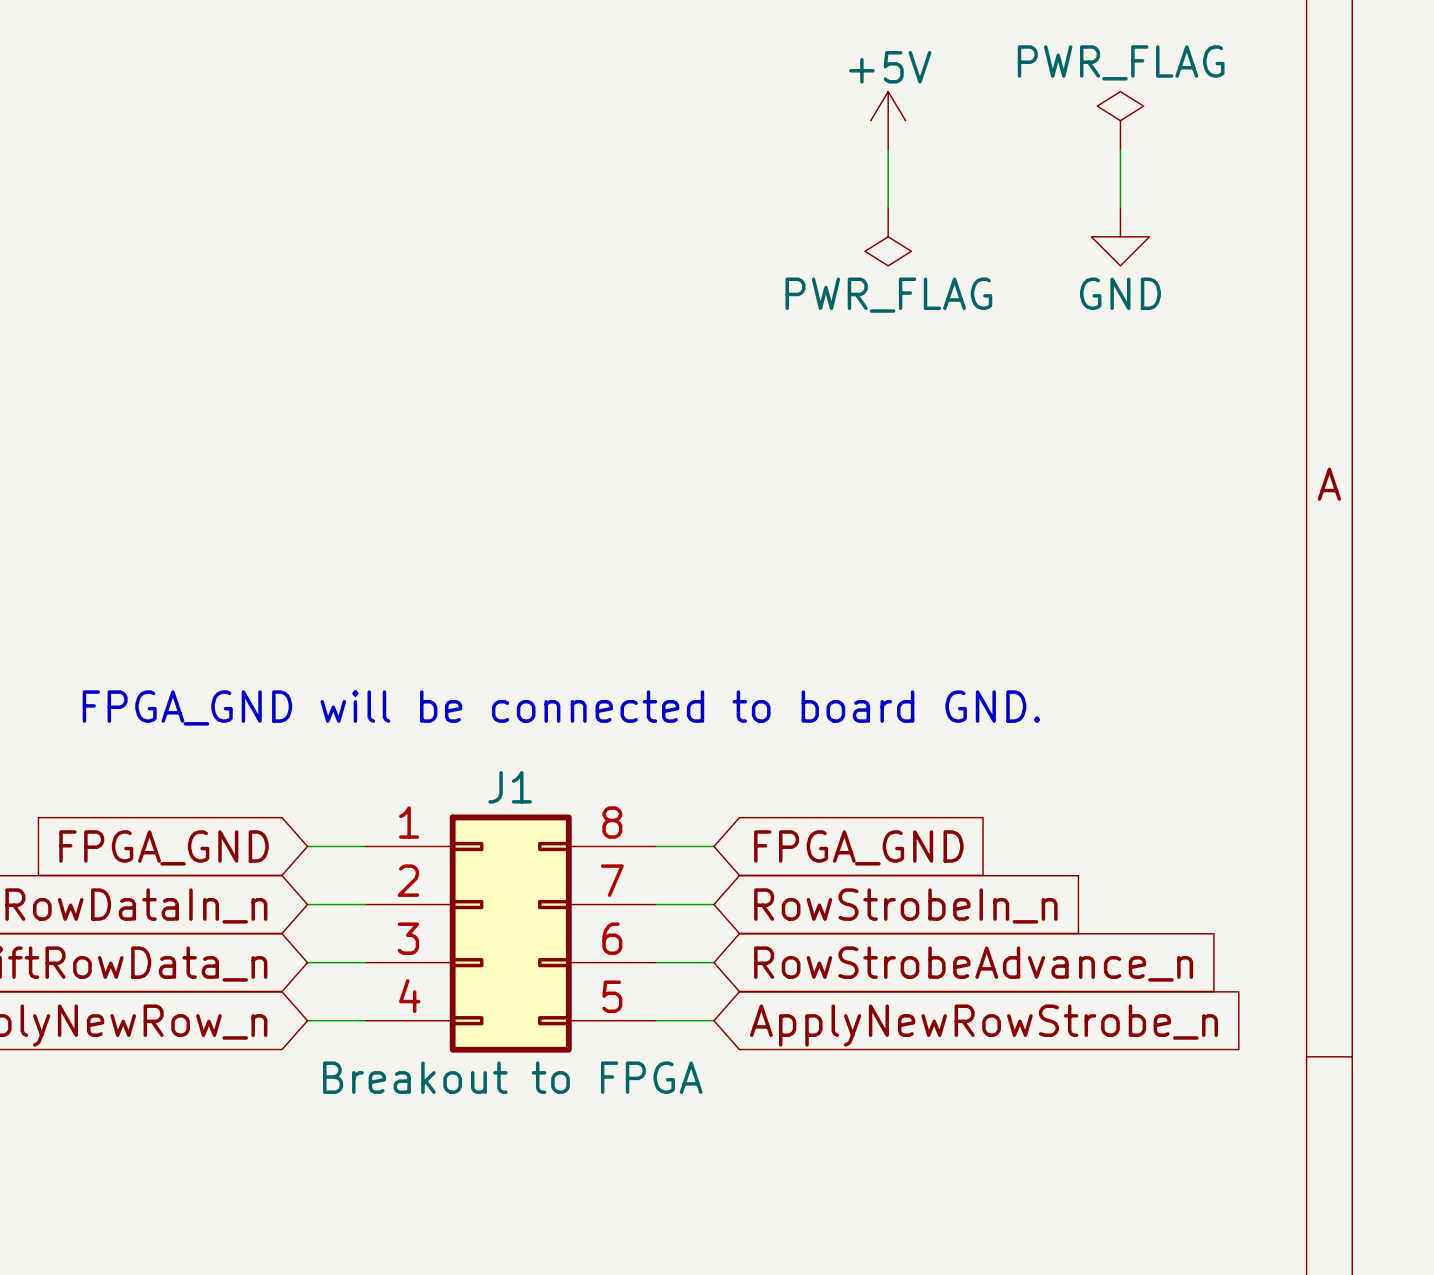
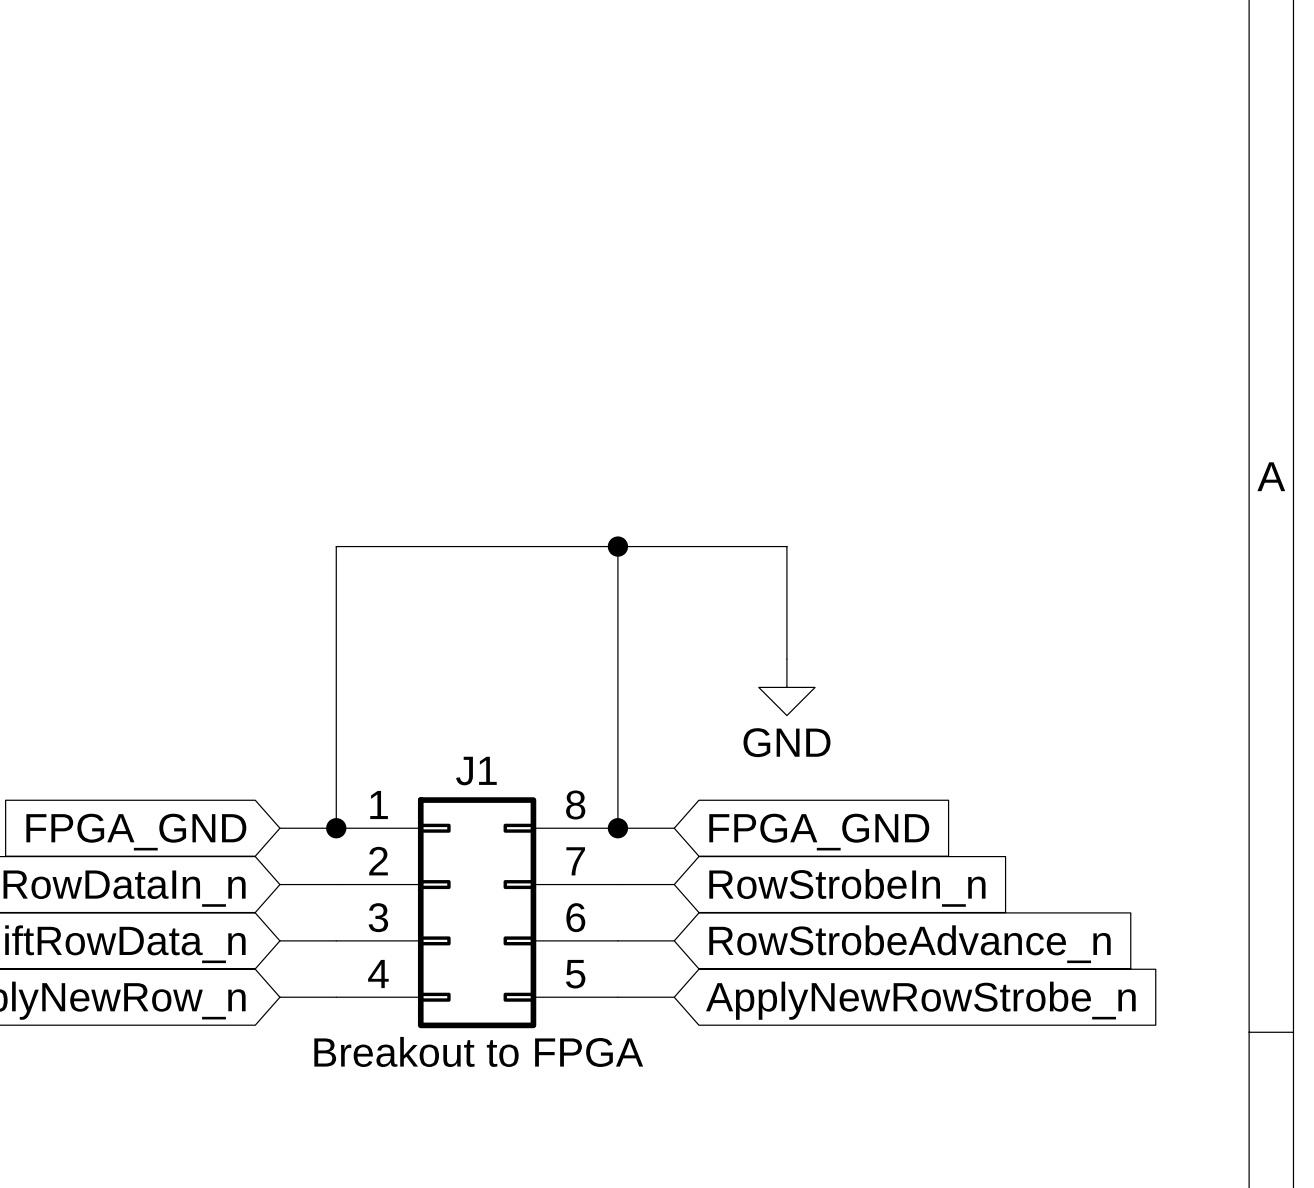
power symbol: +5V (888, 120) -> none
power symbol: PWR_FLAG (1120, 120) -> none
wire: (888, 149) (888, 207) -> none
wire: (1120, 149) (1120, 207) -> none
power symbol: PWR_FLAG (888, 236) -> none
power symbol position: GND (1120, 236) -> GND (786, 687)
wire: none -> (617, 546) (617, 828)
junction: none -> (617, 546)
wire: none -> (786, 659) (786, 546) (336, 546) (336, 828)
text: FPGA_GND will be connected to board GND. (561, 707) -> none
junction: none -> (336, 828)
junction: none -> (617, 828)

